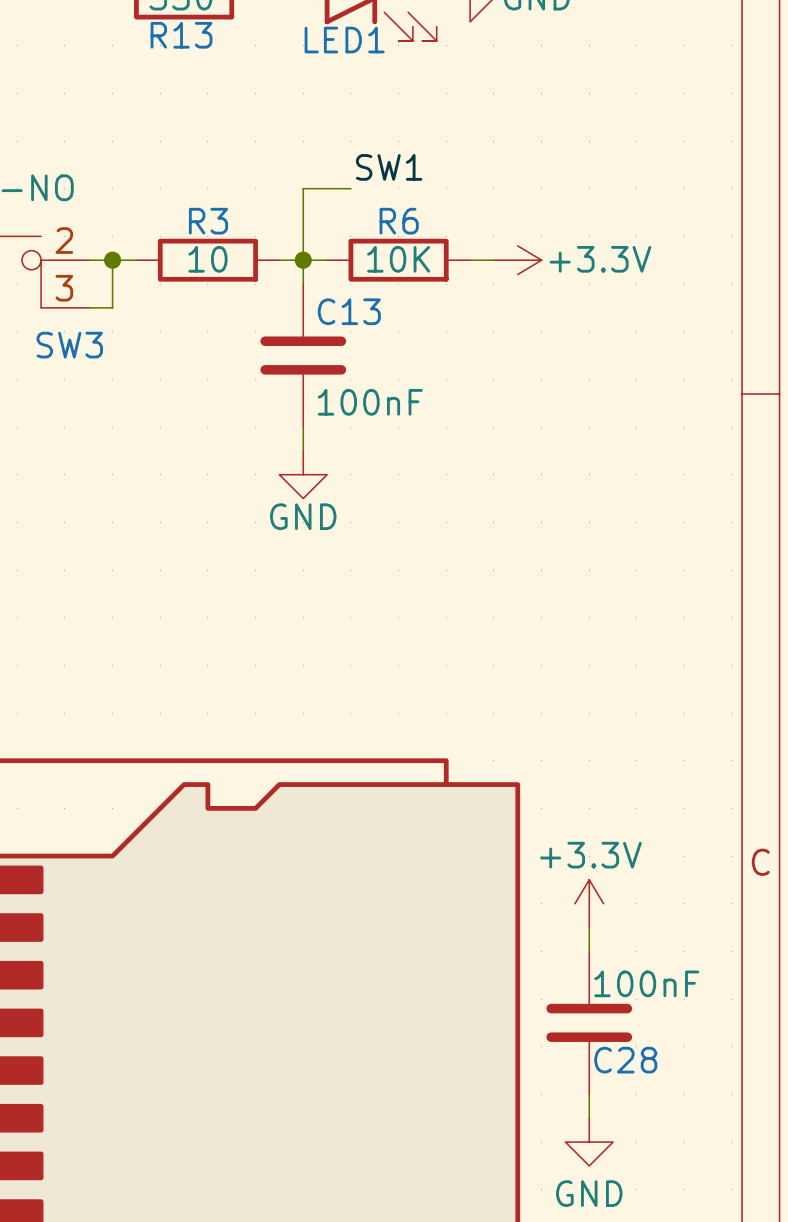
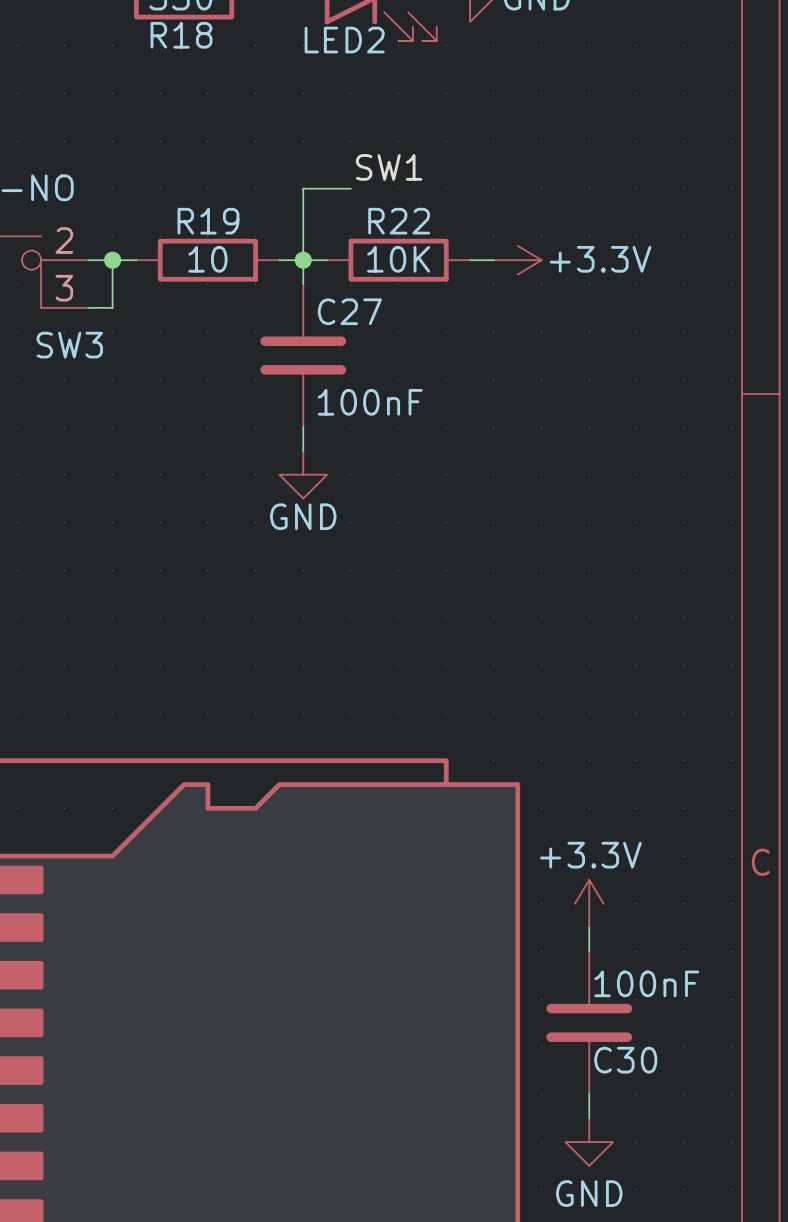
R13 name: R13 (181, 35) -> R18 (181, 35)
LED1 name: LED1 (344, 40) -> LED2 (344, 40)
R3 name: R3 (208, 221) -> R19 (208, 221)
R6 name: R6 (399, 221) -> R22 (399, 221)
C13 name: C13 (349, 311) -> C27 (349, 311)
C28 name: C28 (625, 1060) -> C30 (625, 1060)

